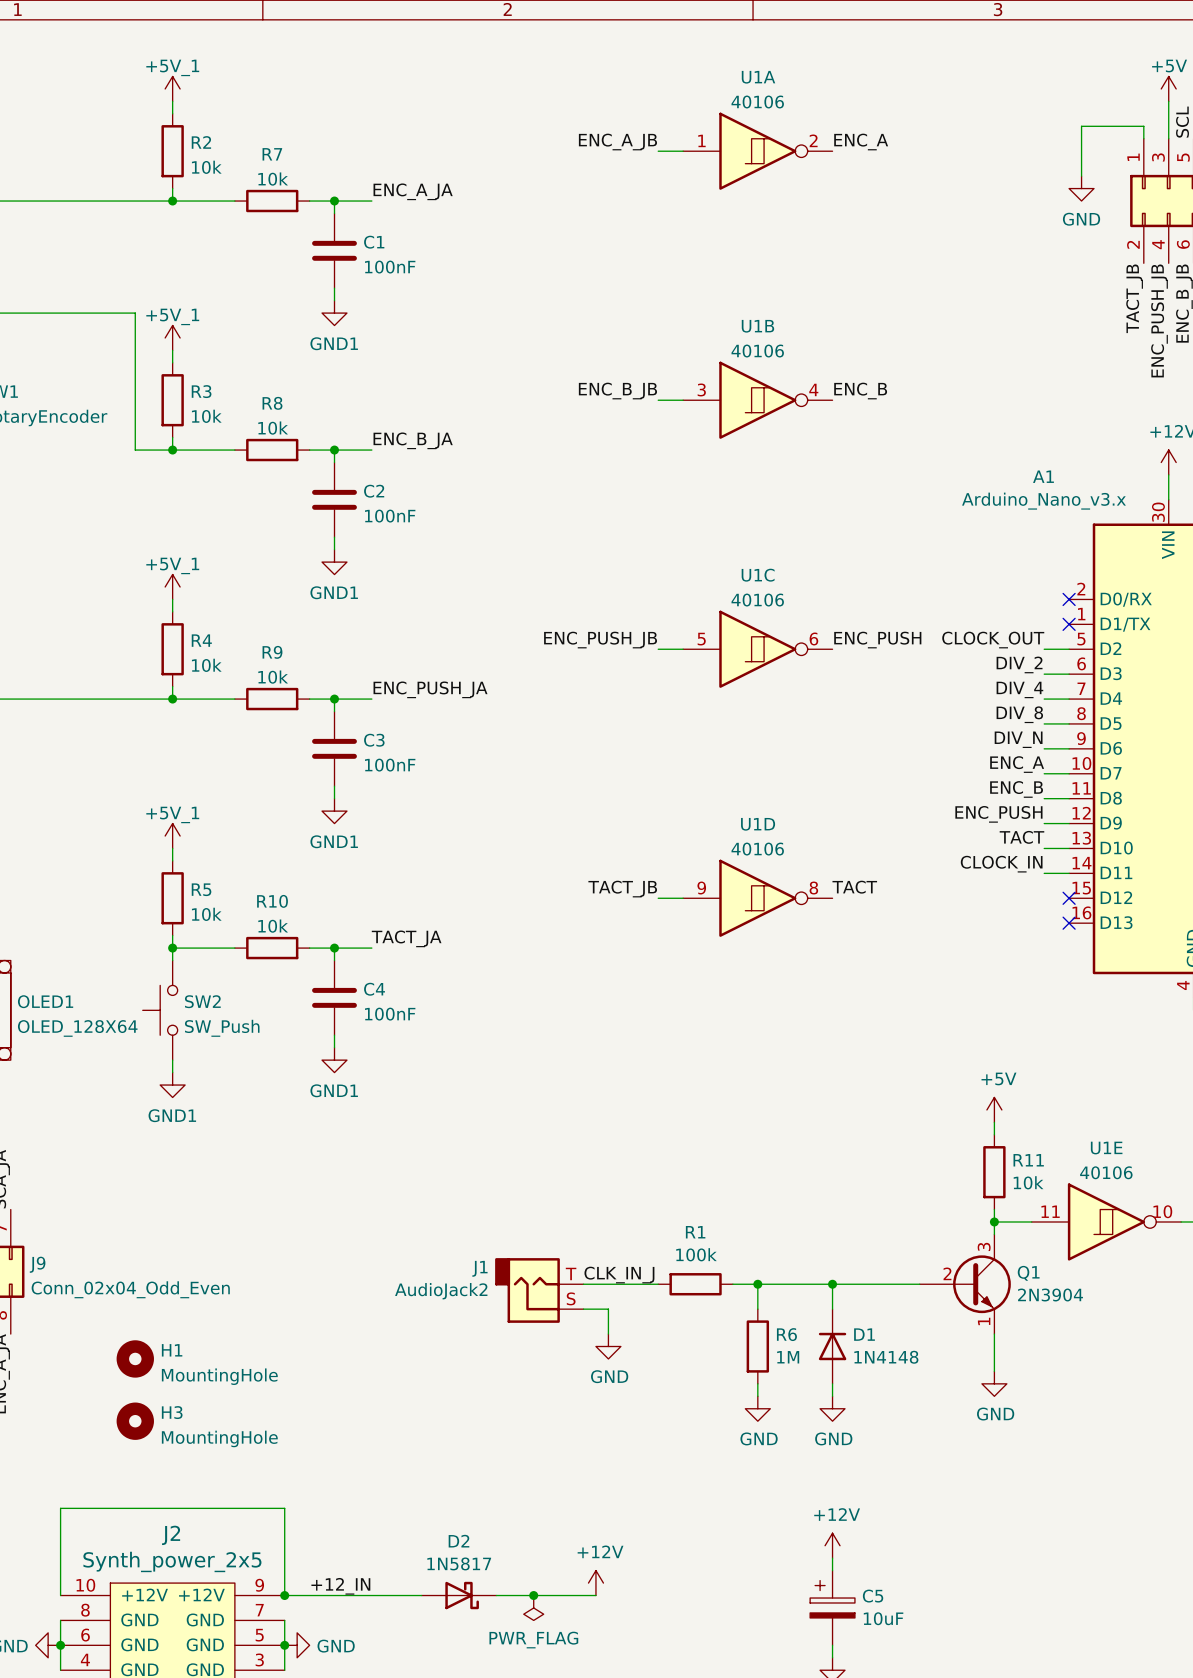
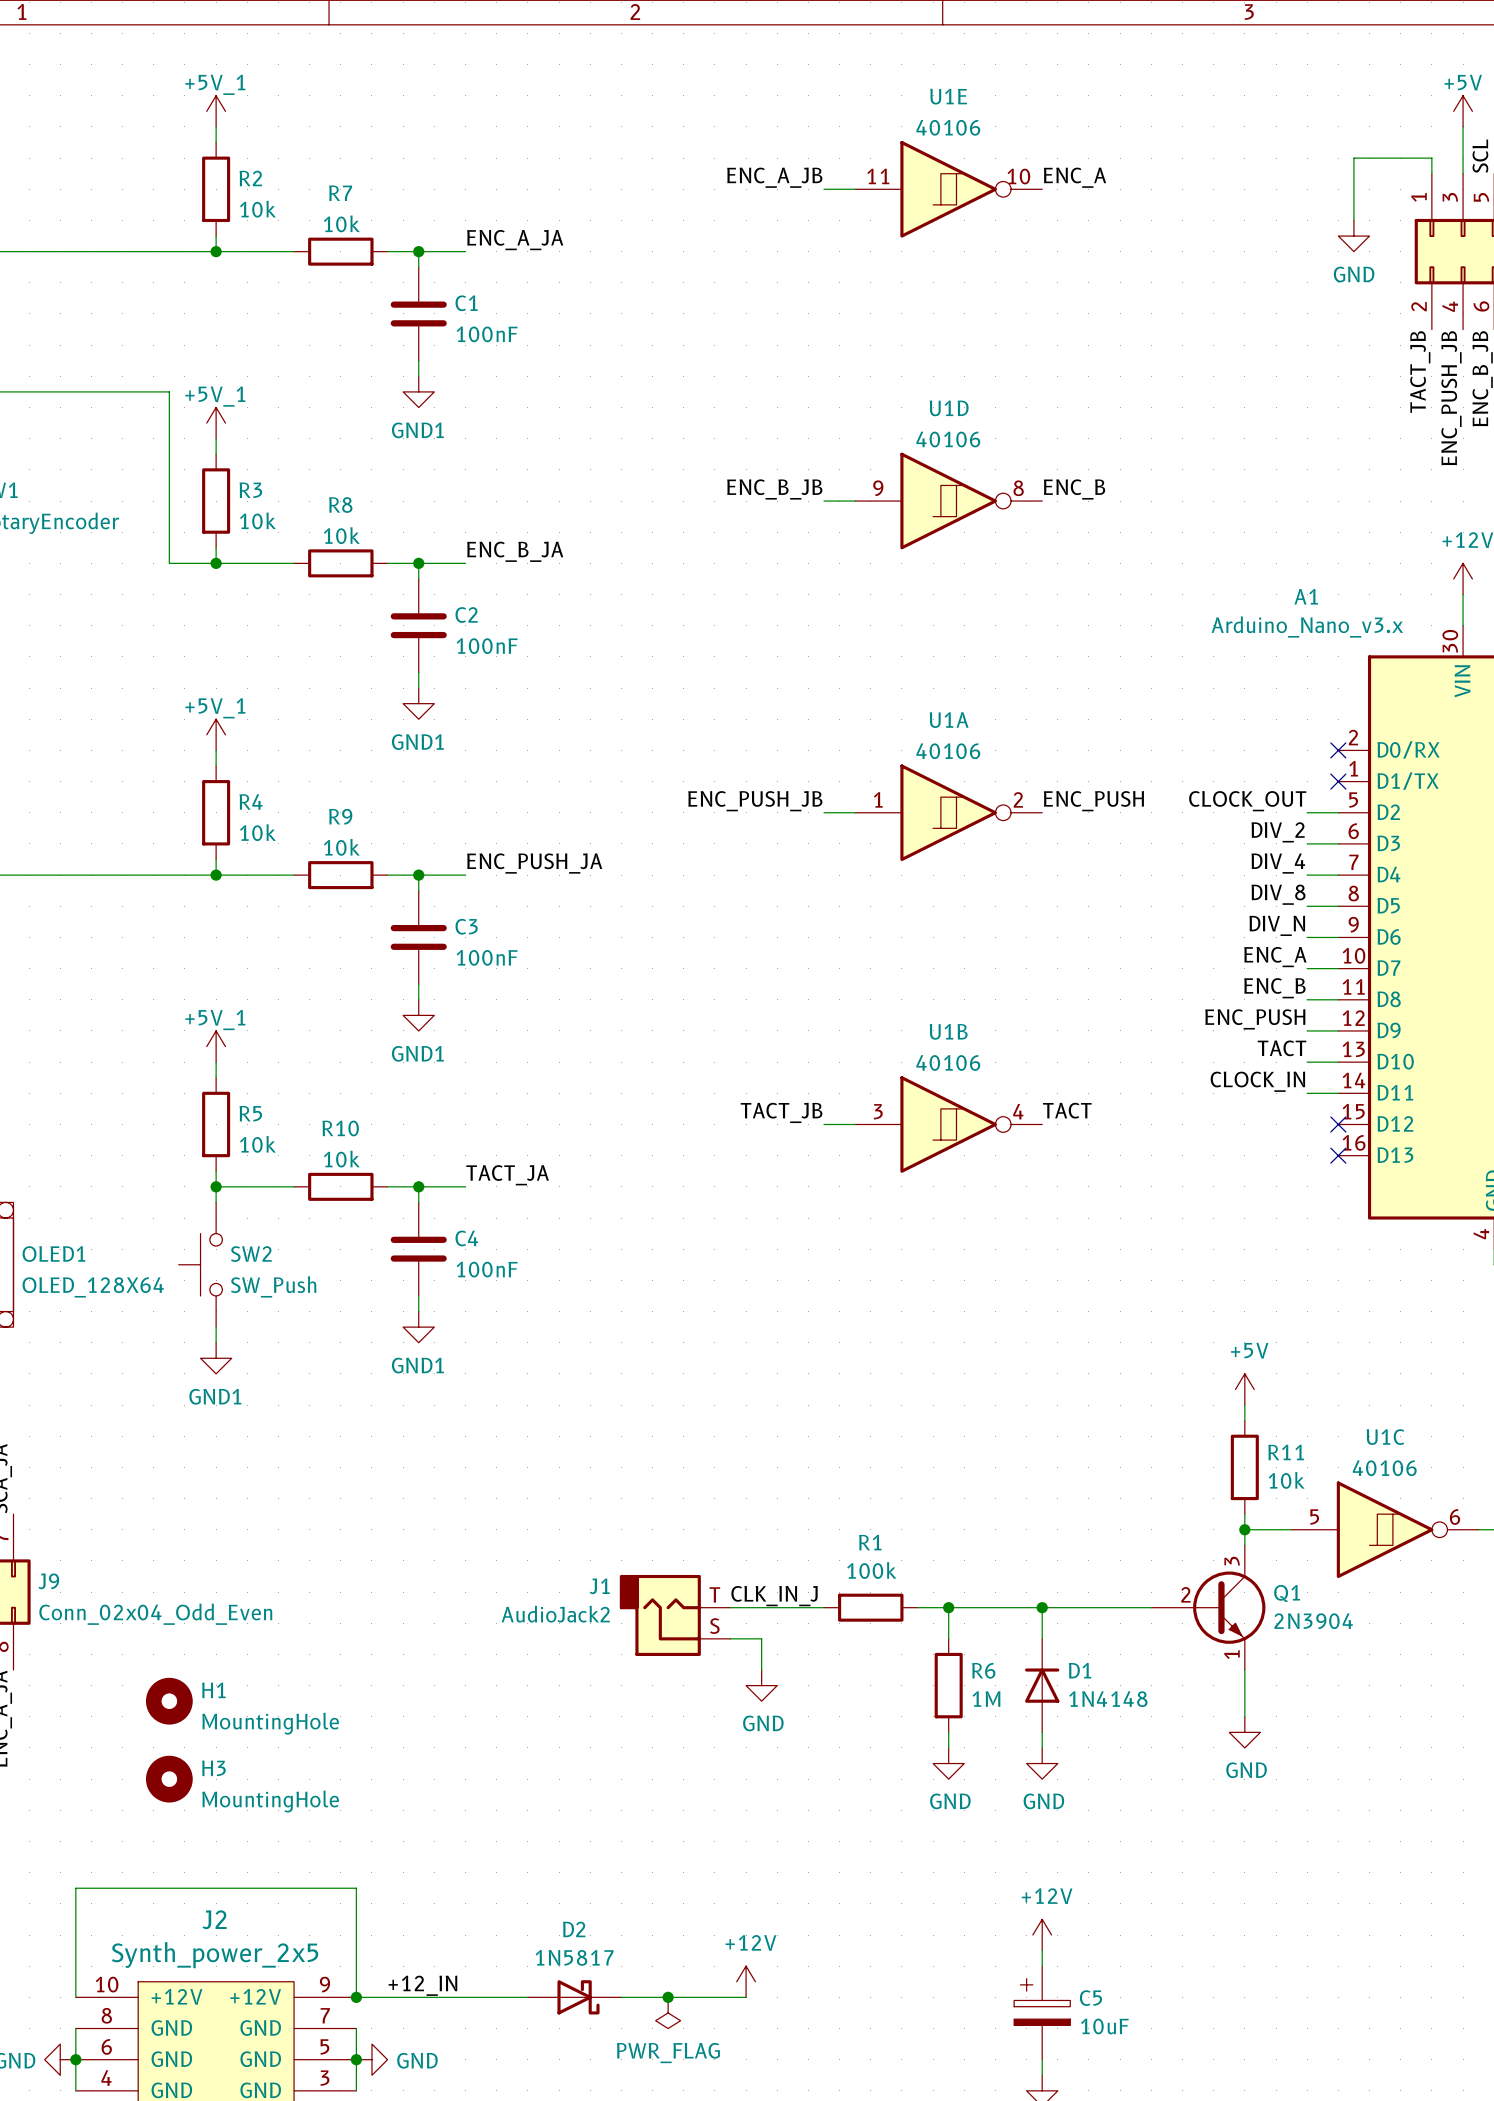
U1A position: (757, 151) -> (948, 812)
U1B position: (757, 400) -> (948, 1124)
U1C position: (757, 649) -> (1385, 1529)
U1D position: (757, 898) -> (948, 501)
U1E position: (1106, 1221) -> (948, 189)

